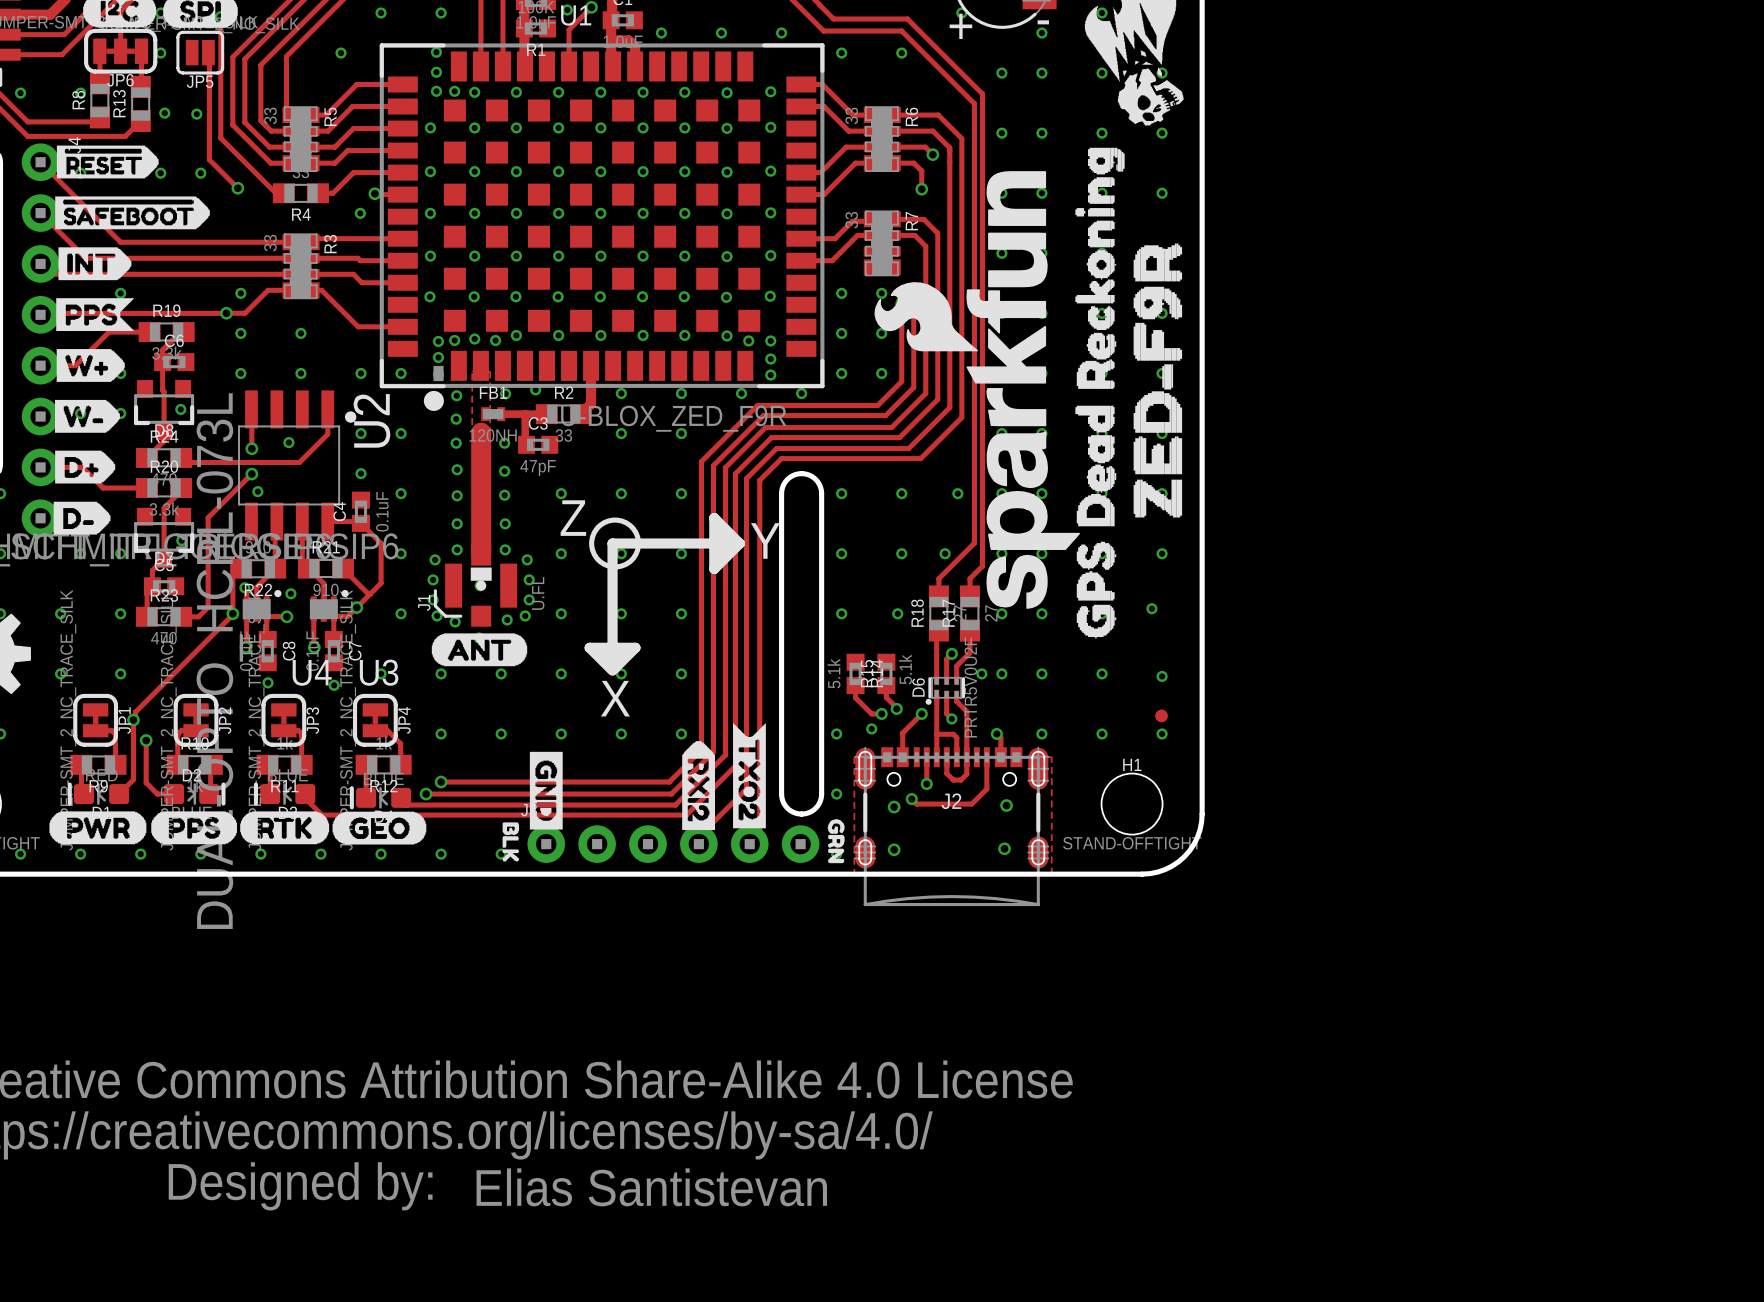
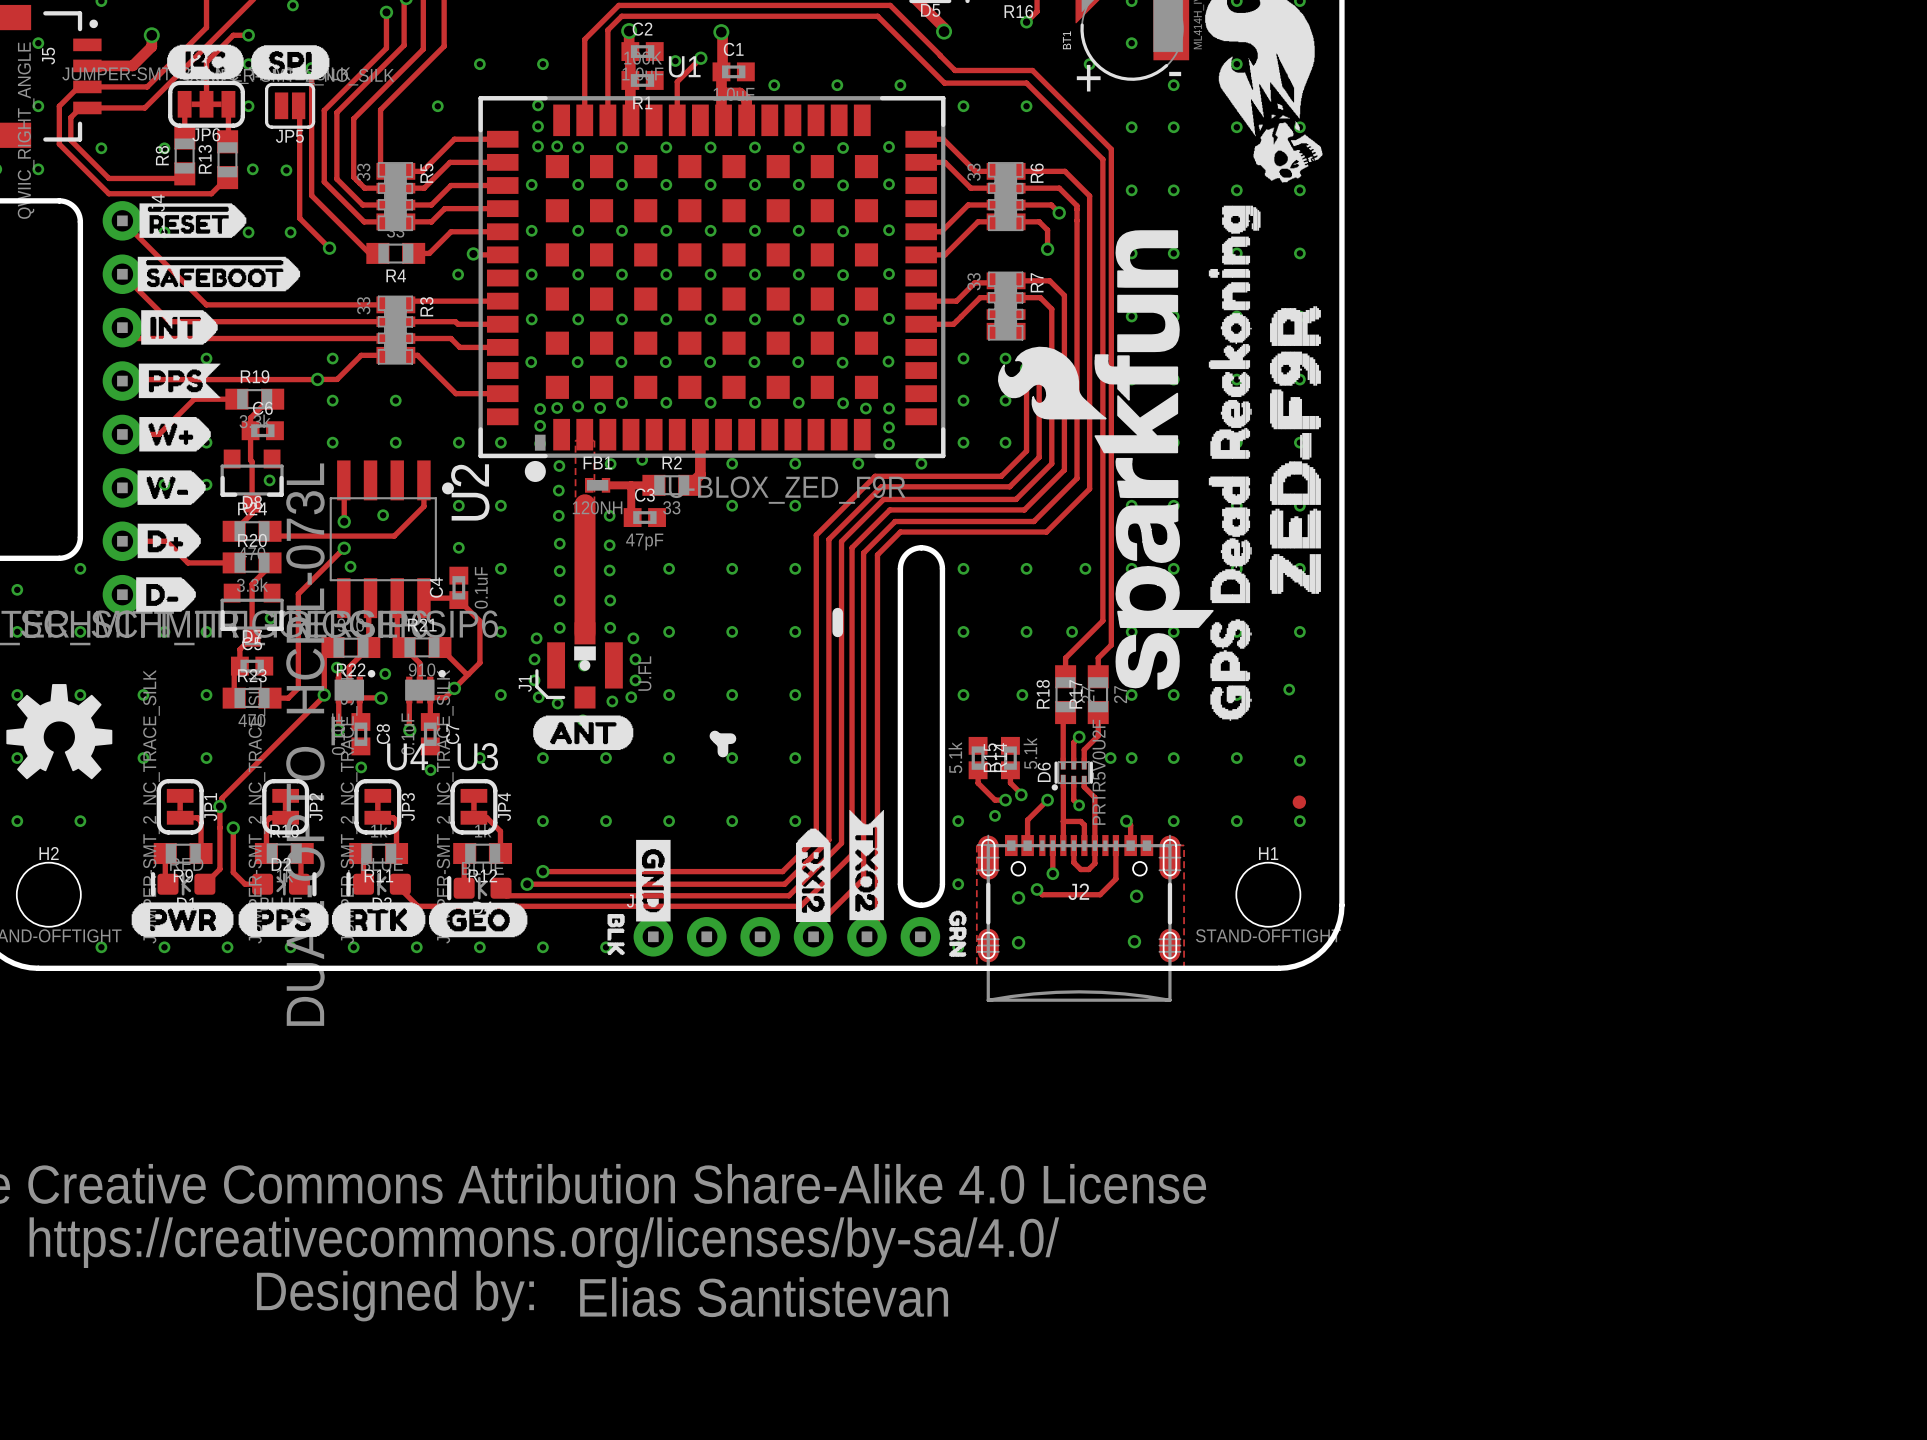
drawing: [589, 517, 642, 570] -> none
text: Z (573, 518) -> none
text: Y (765, 540) -> none
line: (739, 543) (714, 568) (714, 518) (739, 543) -> none
line: (739, 543) (612, 543) (612, 645) -> none
line: (589, 647) (612, 670) (612, 668) (615, 668) (635, 647) (589, 647) -> none
text: X (615, 698) -> none

